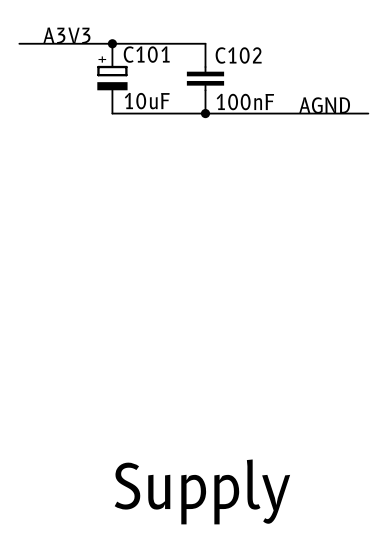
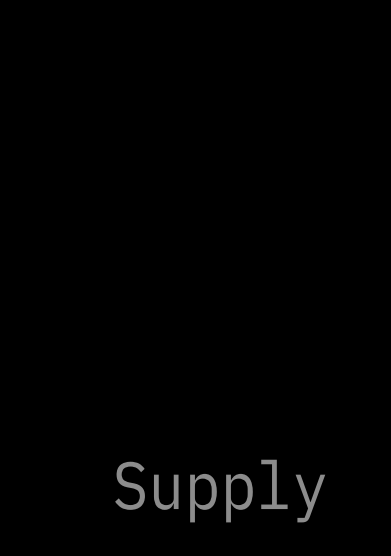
label: A3V3 (66, 35) -> none
wire: (19, 43) (205, 43) -> none
junction: (112, 43) -> none
C101: 10uF (112, 78) -> none
C102: 100nF (205, 78) -> none
label: AGND (324, 105) -> none
wire: (112, 113) (368, 113) -> none
junction: (205, 113) -> none

